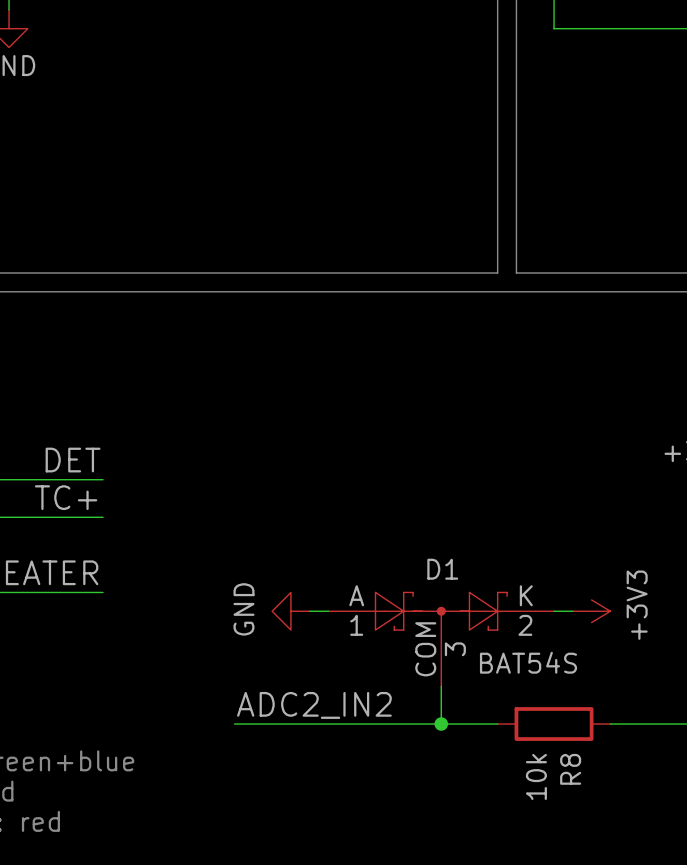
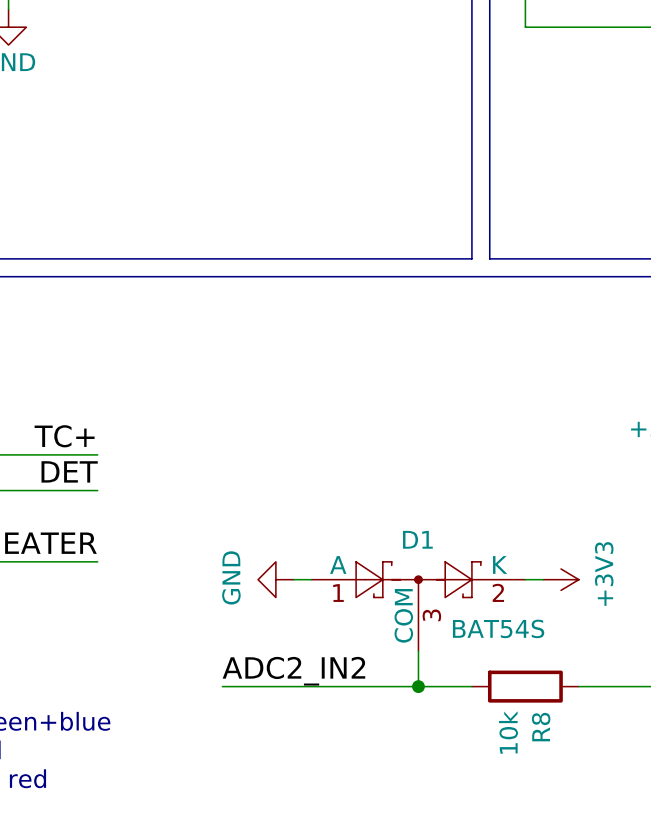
label: DET (73, 460) -> TC+ (64, 436)
label: TC+ (66, 497) -> DET (69, 471)

